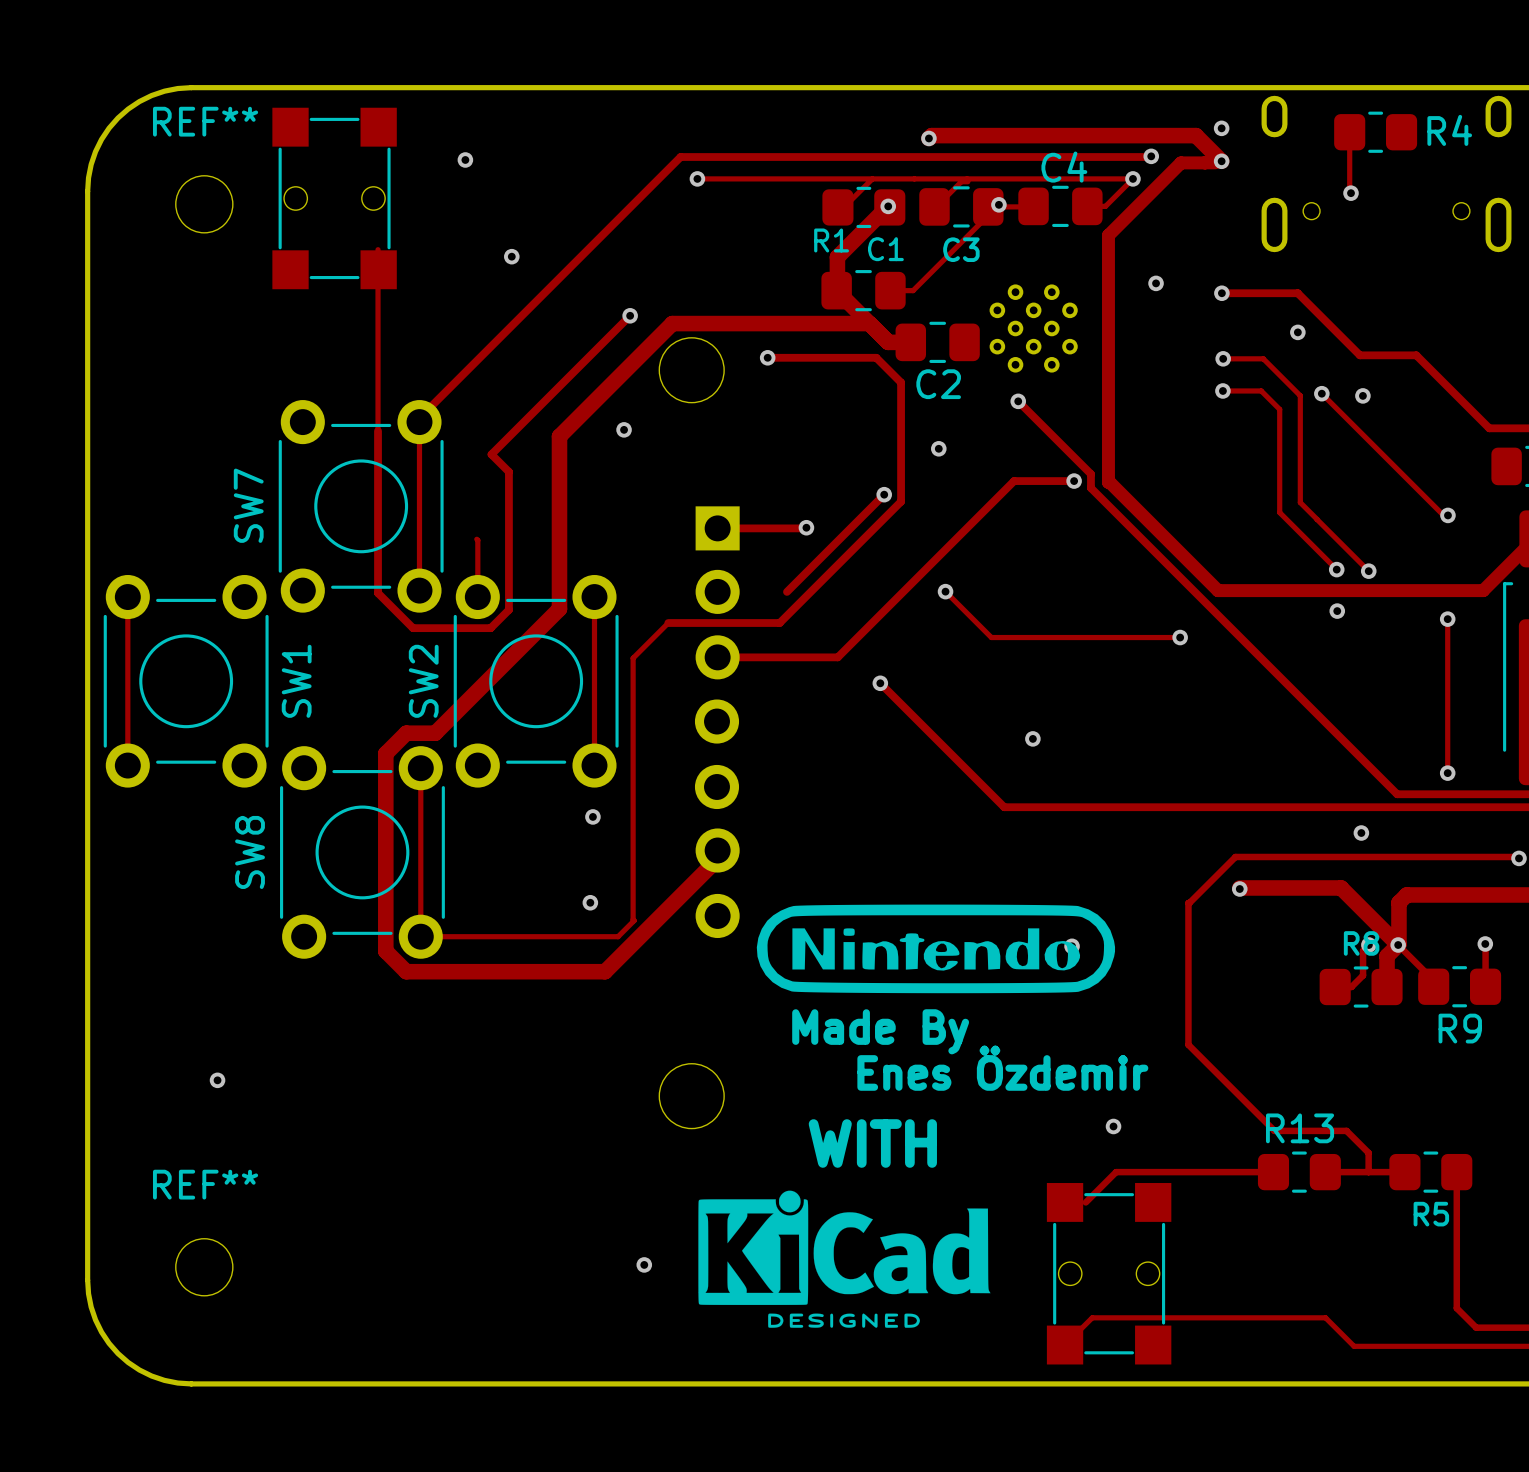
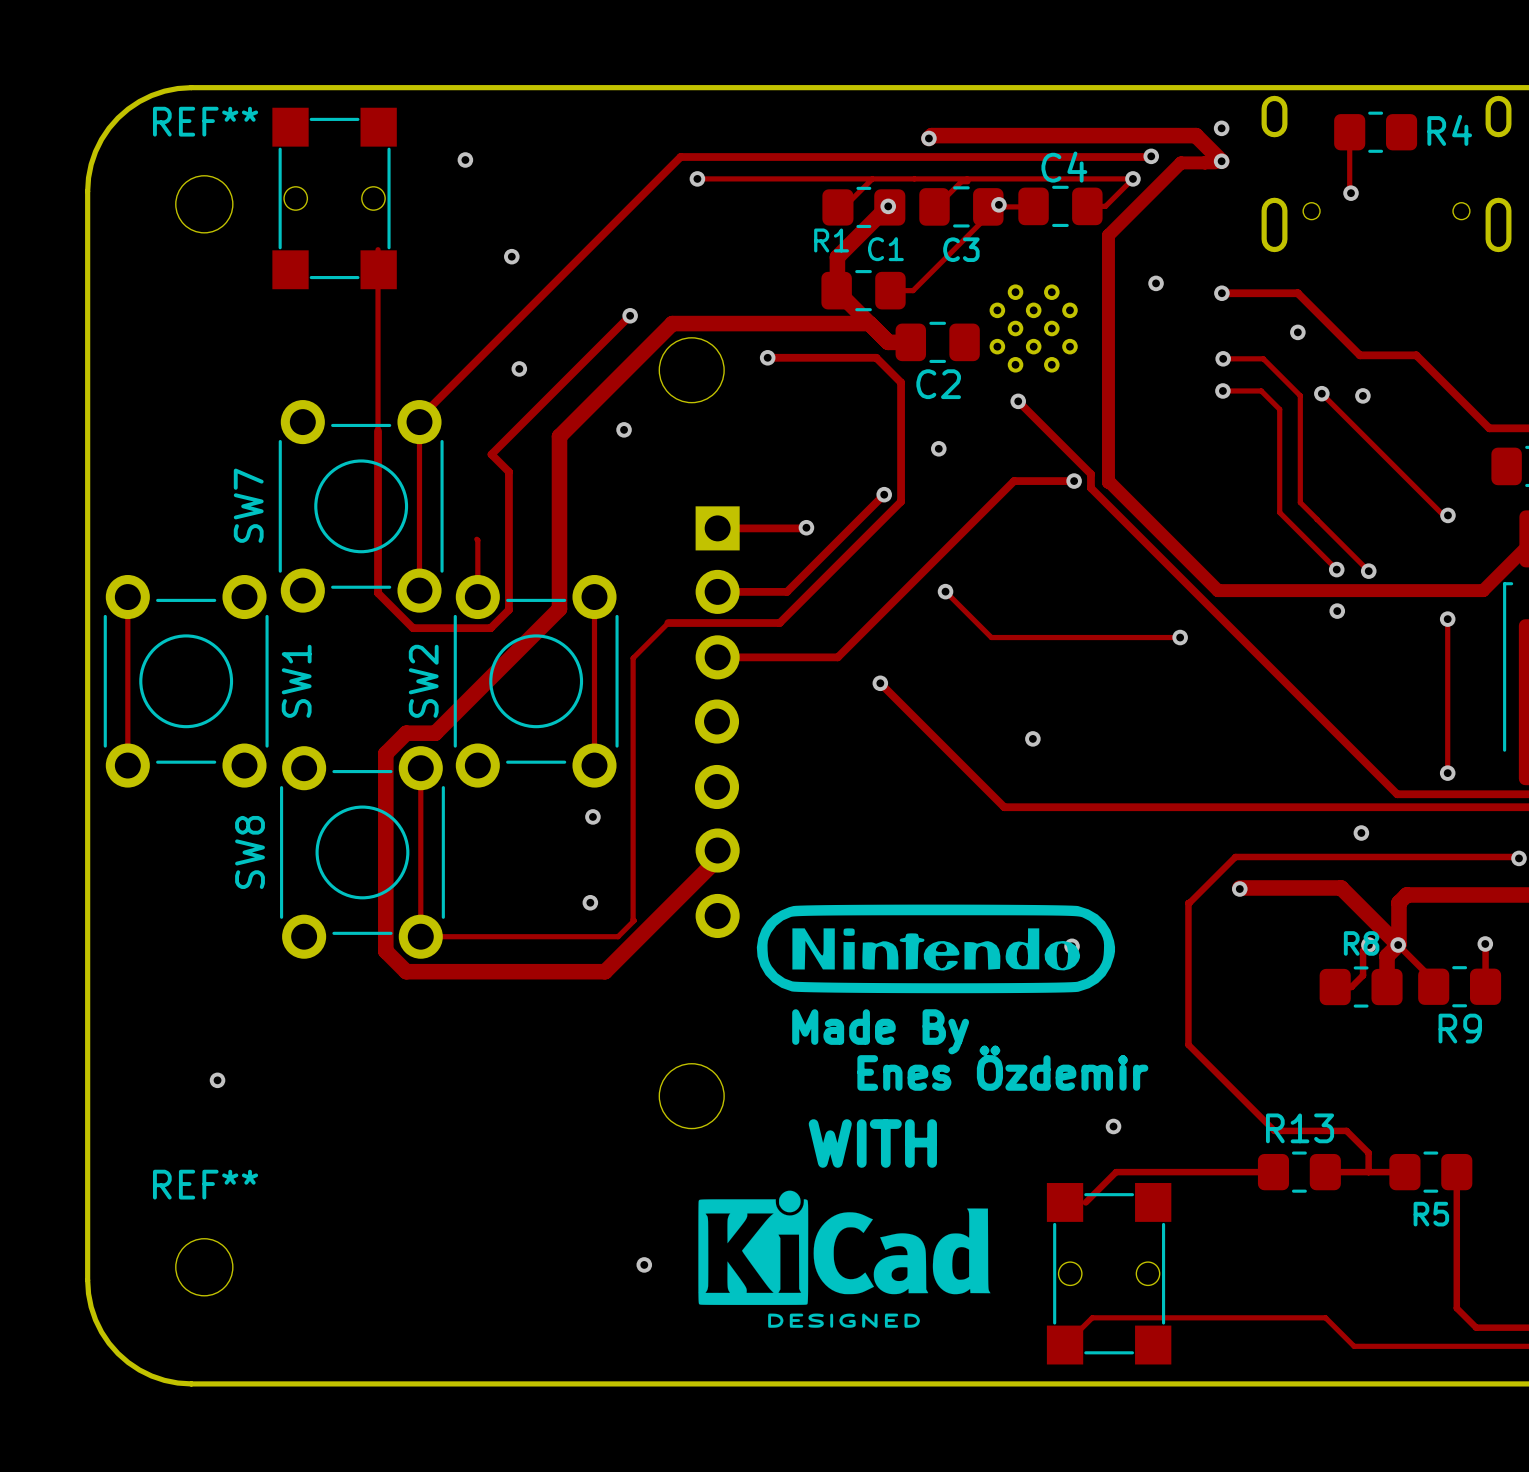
via: none -> (519, 368)
track: none -> (717, 591) (786, 591)

